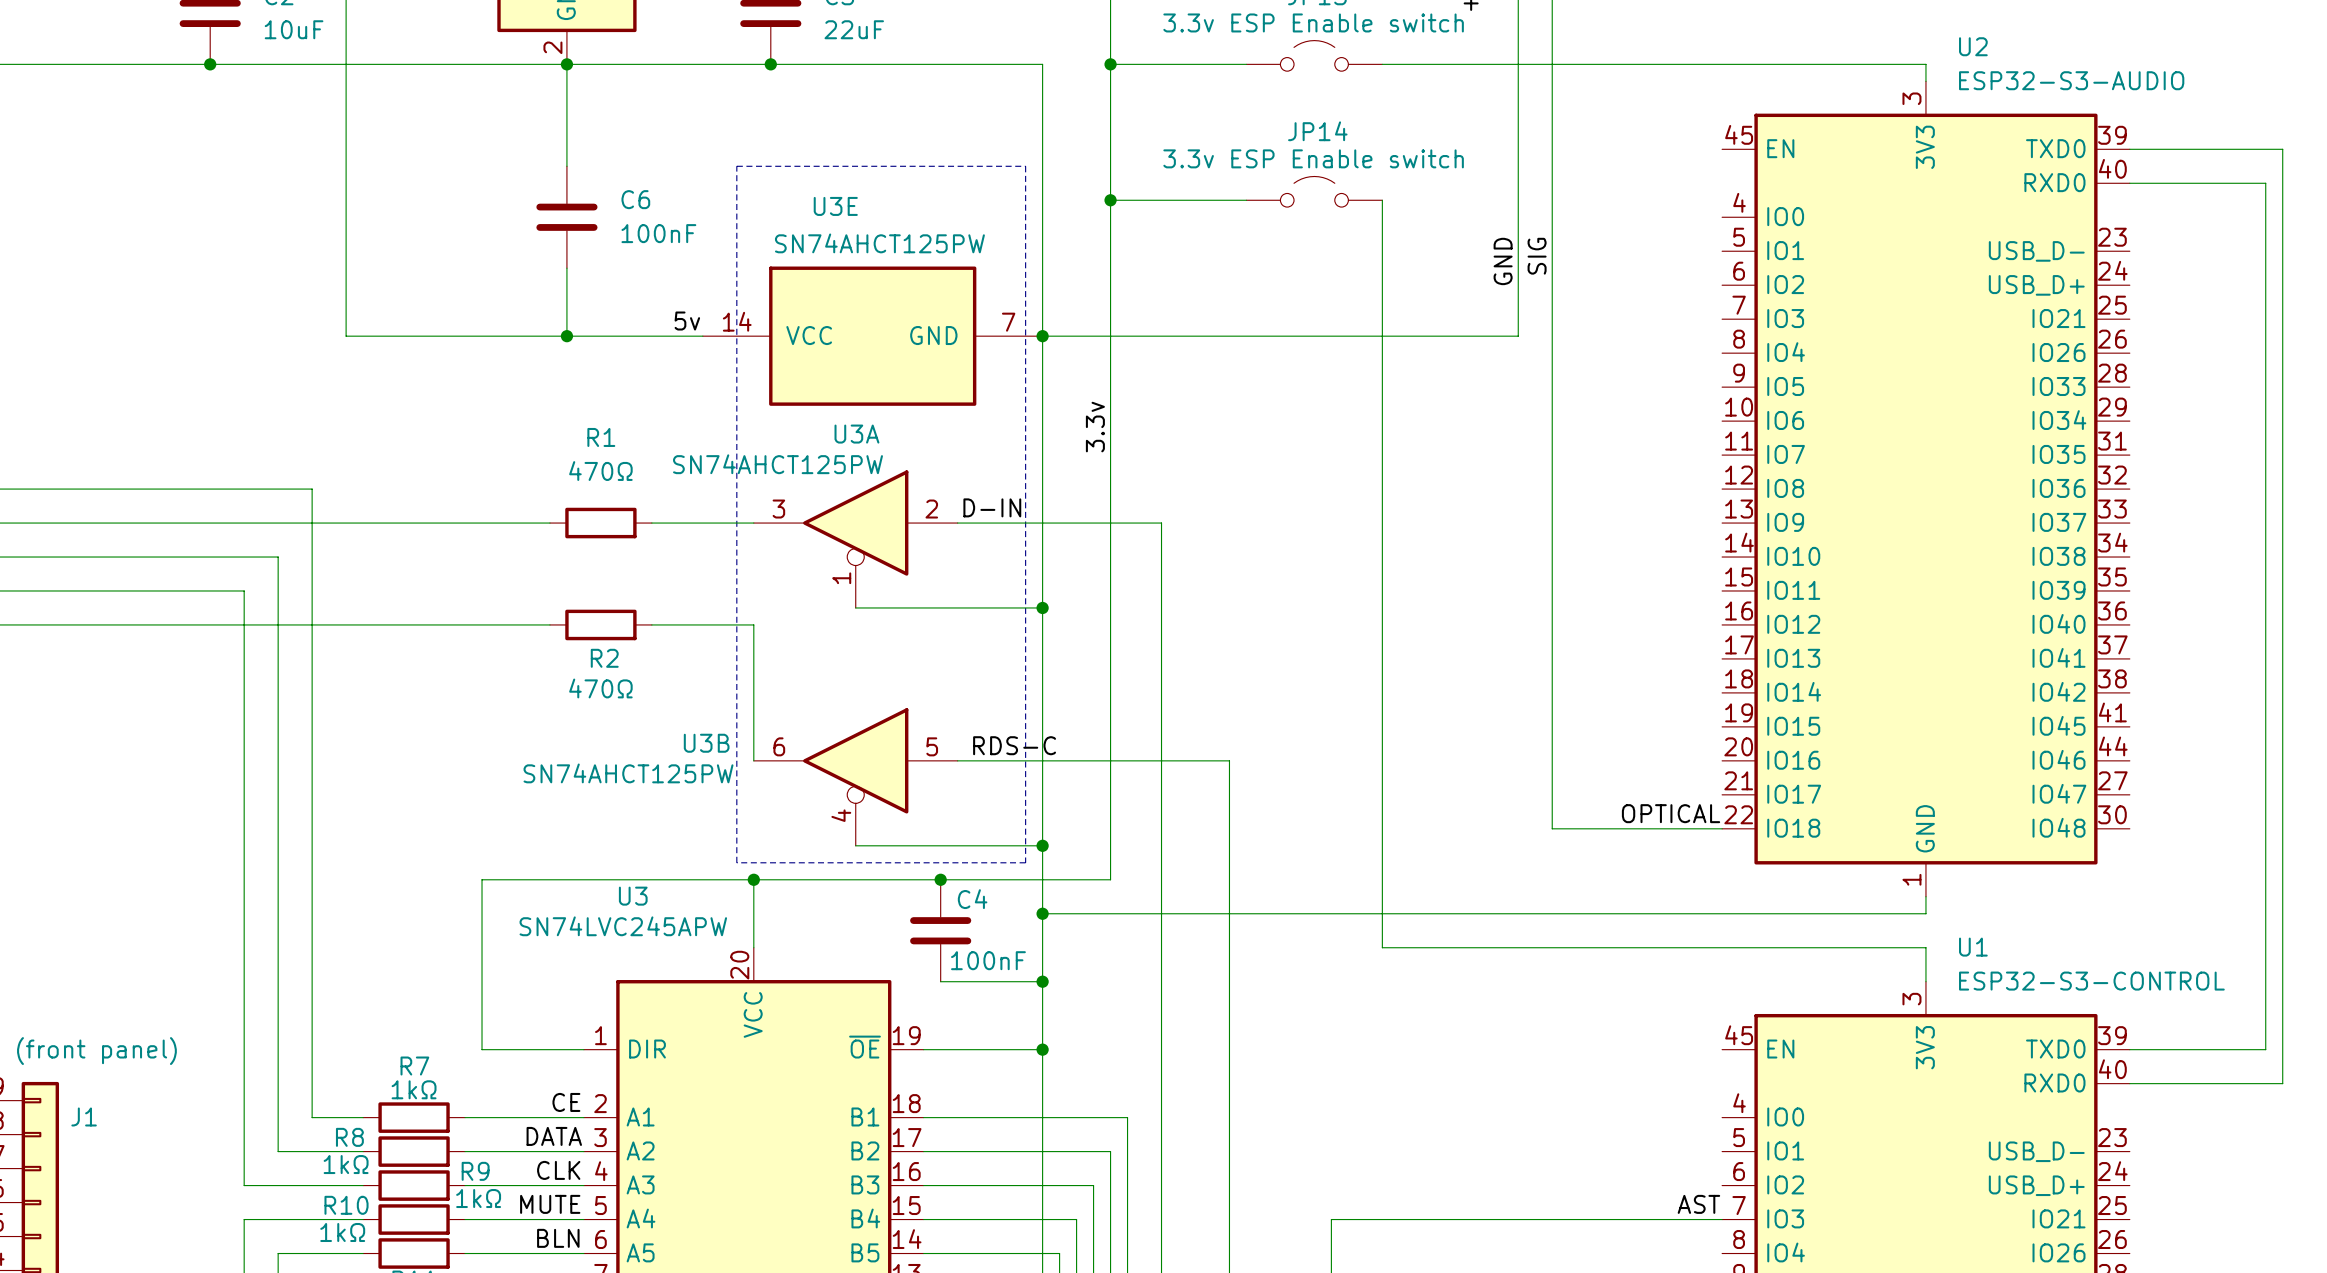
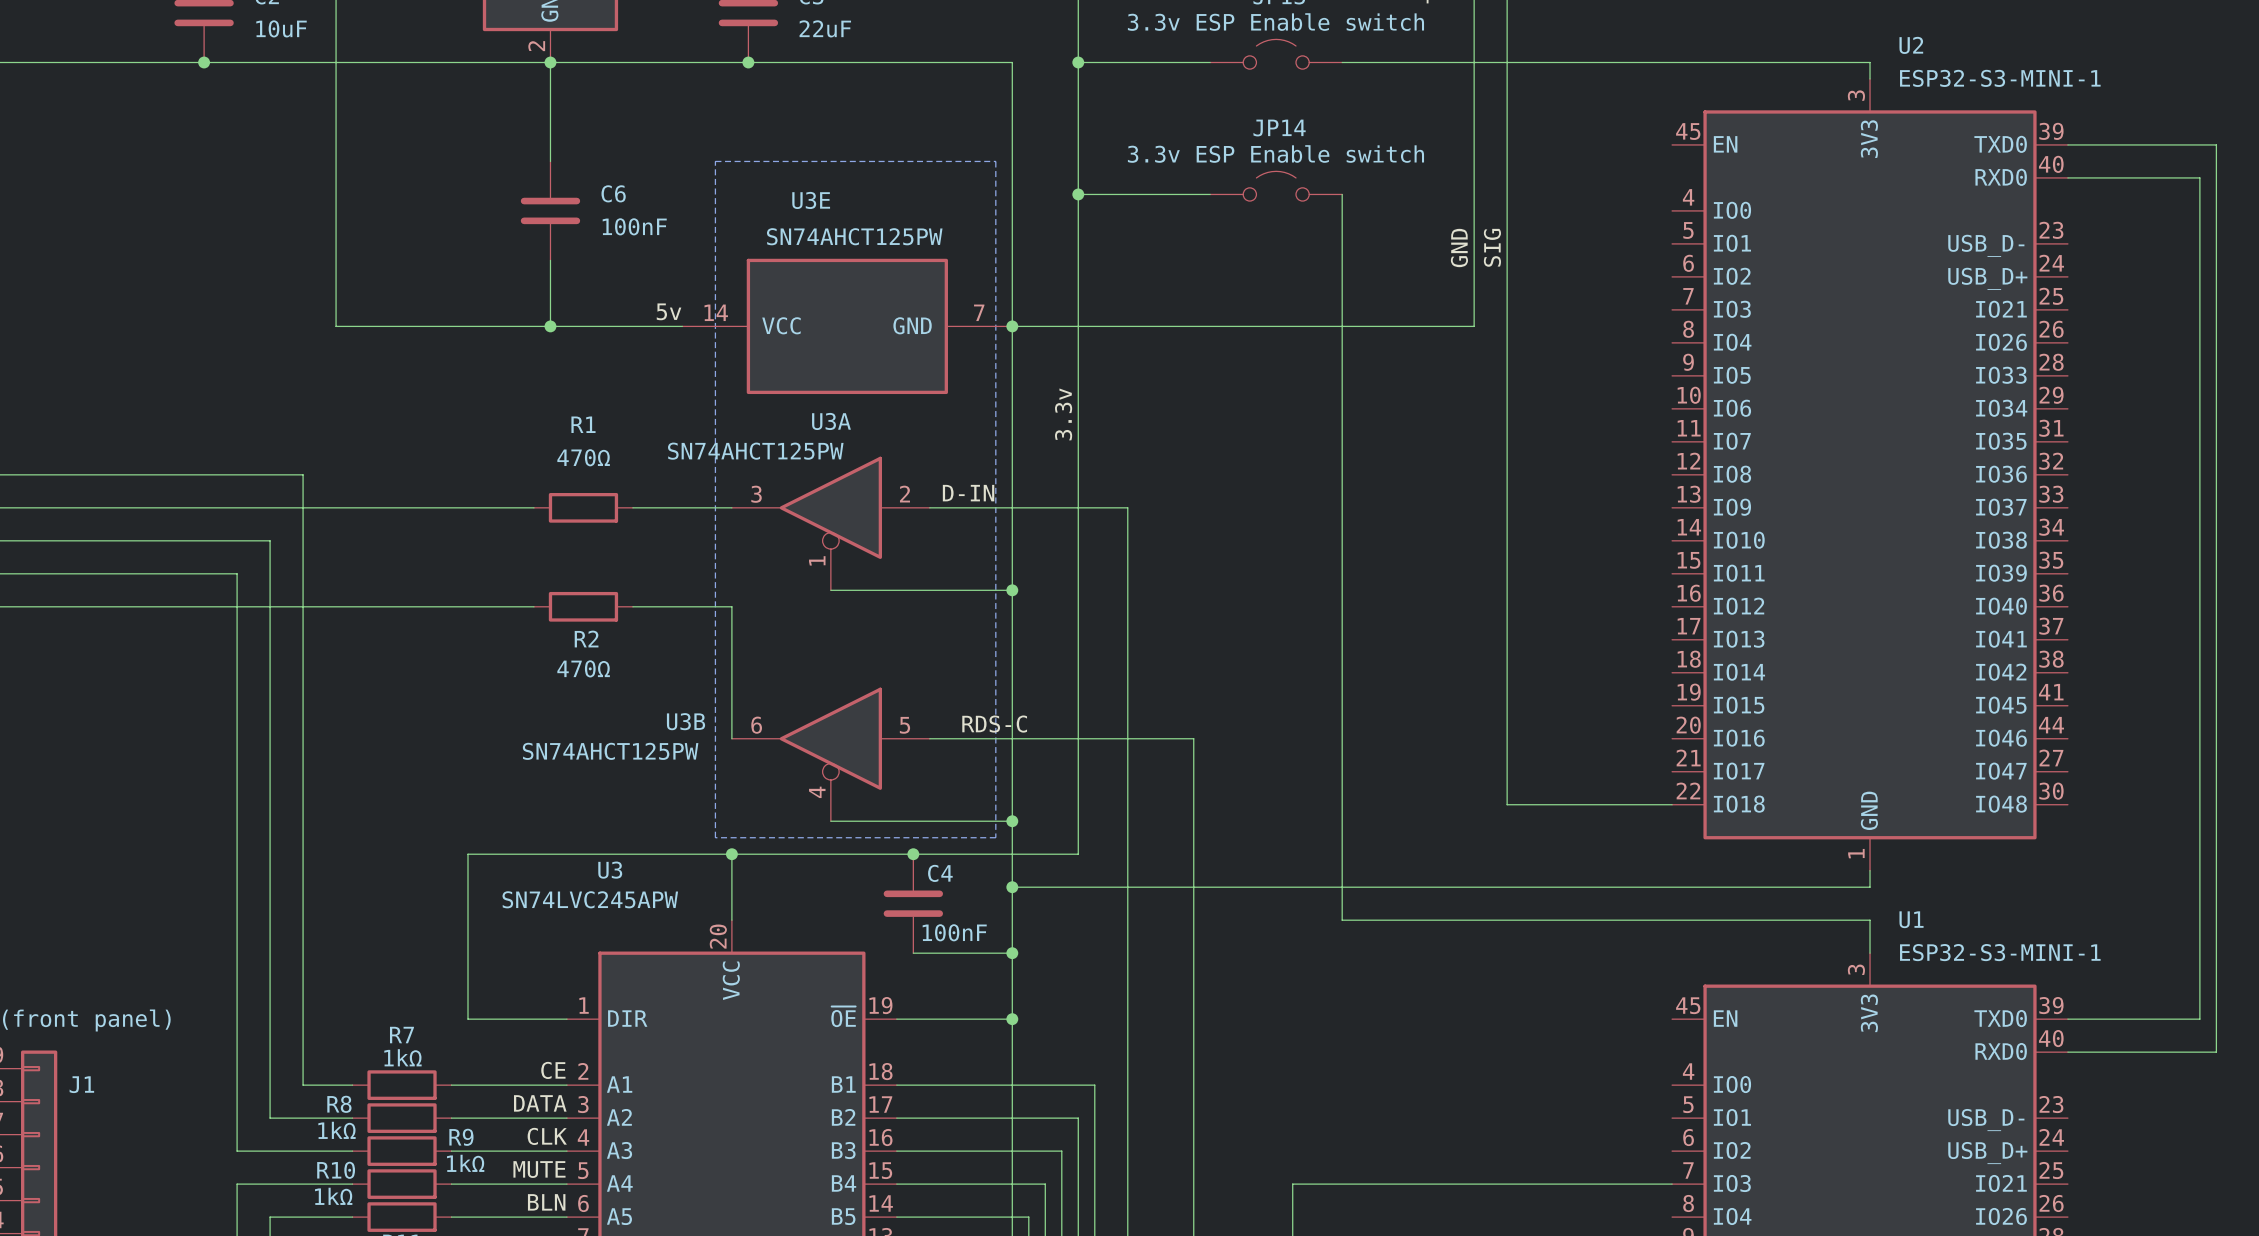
U2 value: ESP32-S3-AUDIO (2071, 80) -> ESP32-S3-MINI-1 (2000, 78)
label: OPTICAL (1671, 813) -> none
U1 value: ESP32-S3-CONTROL (2091, 981) -> ESP32-S3-MINI-1 (2000, 952)
label: AST (1698, 1204) -> none

